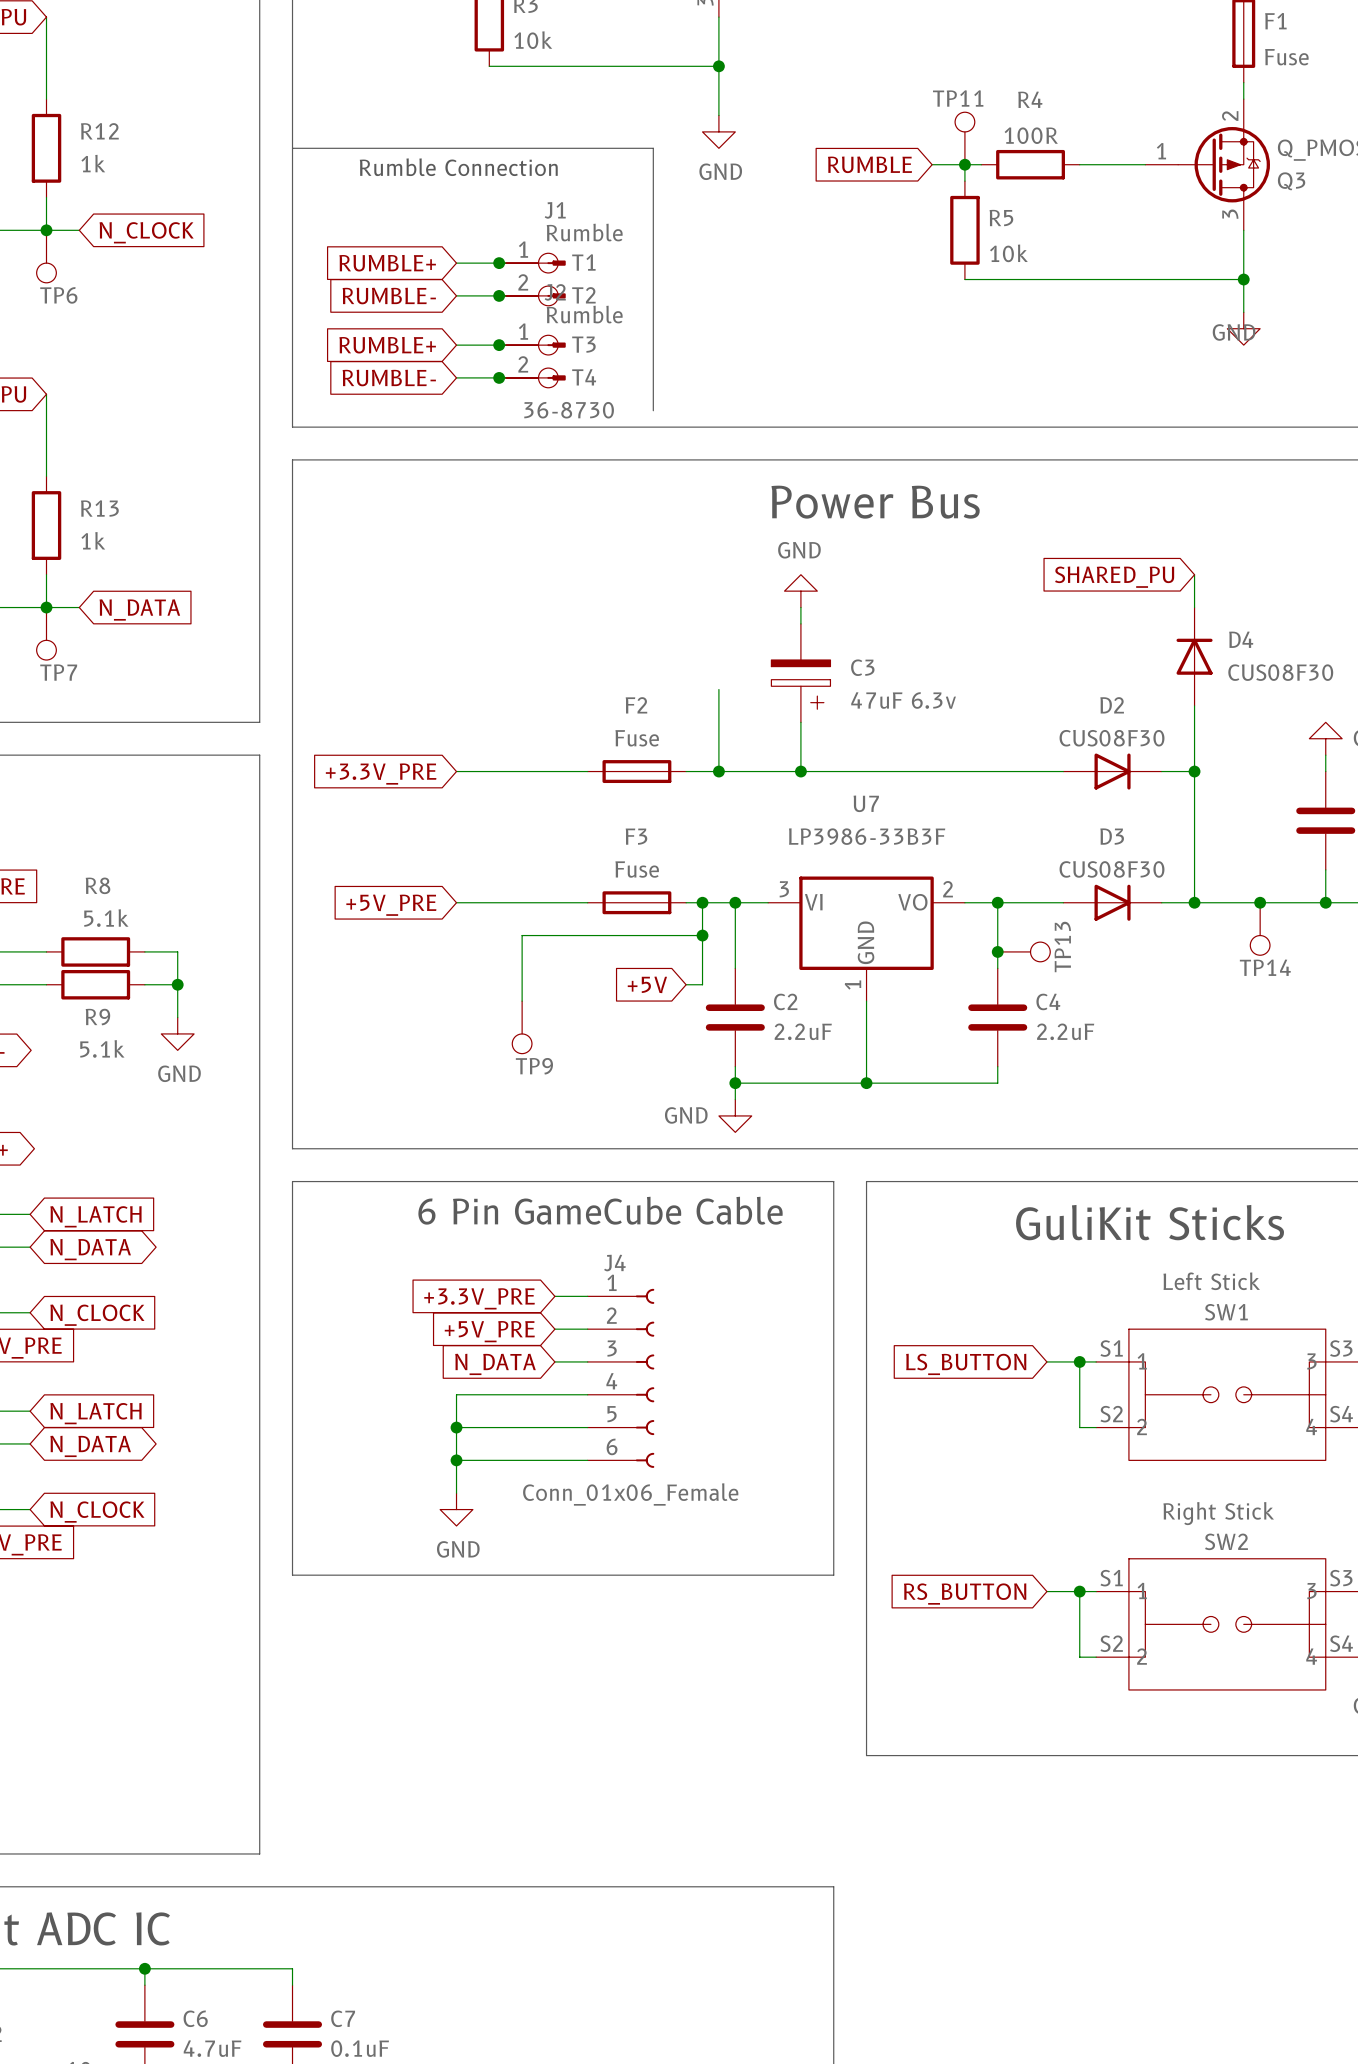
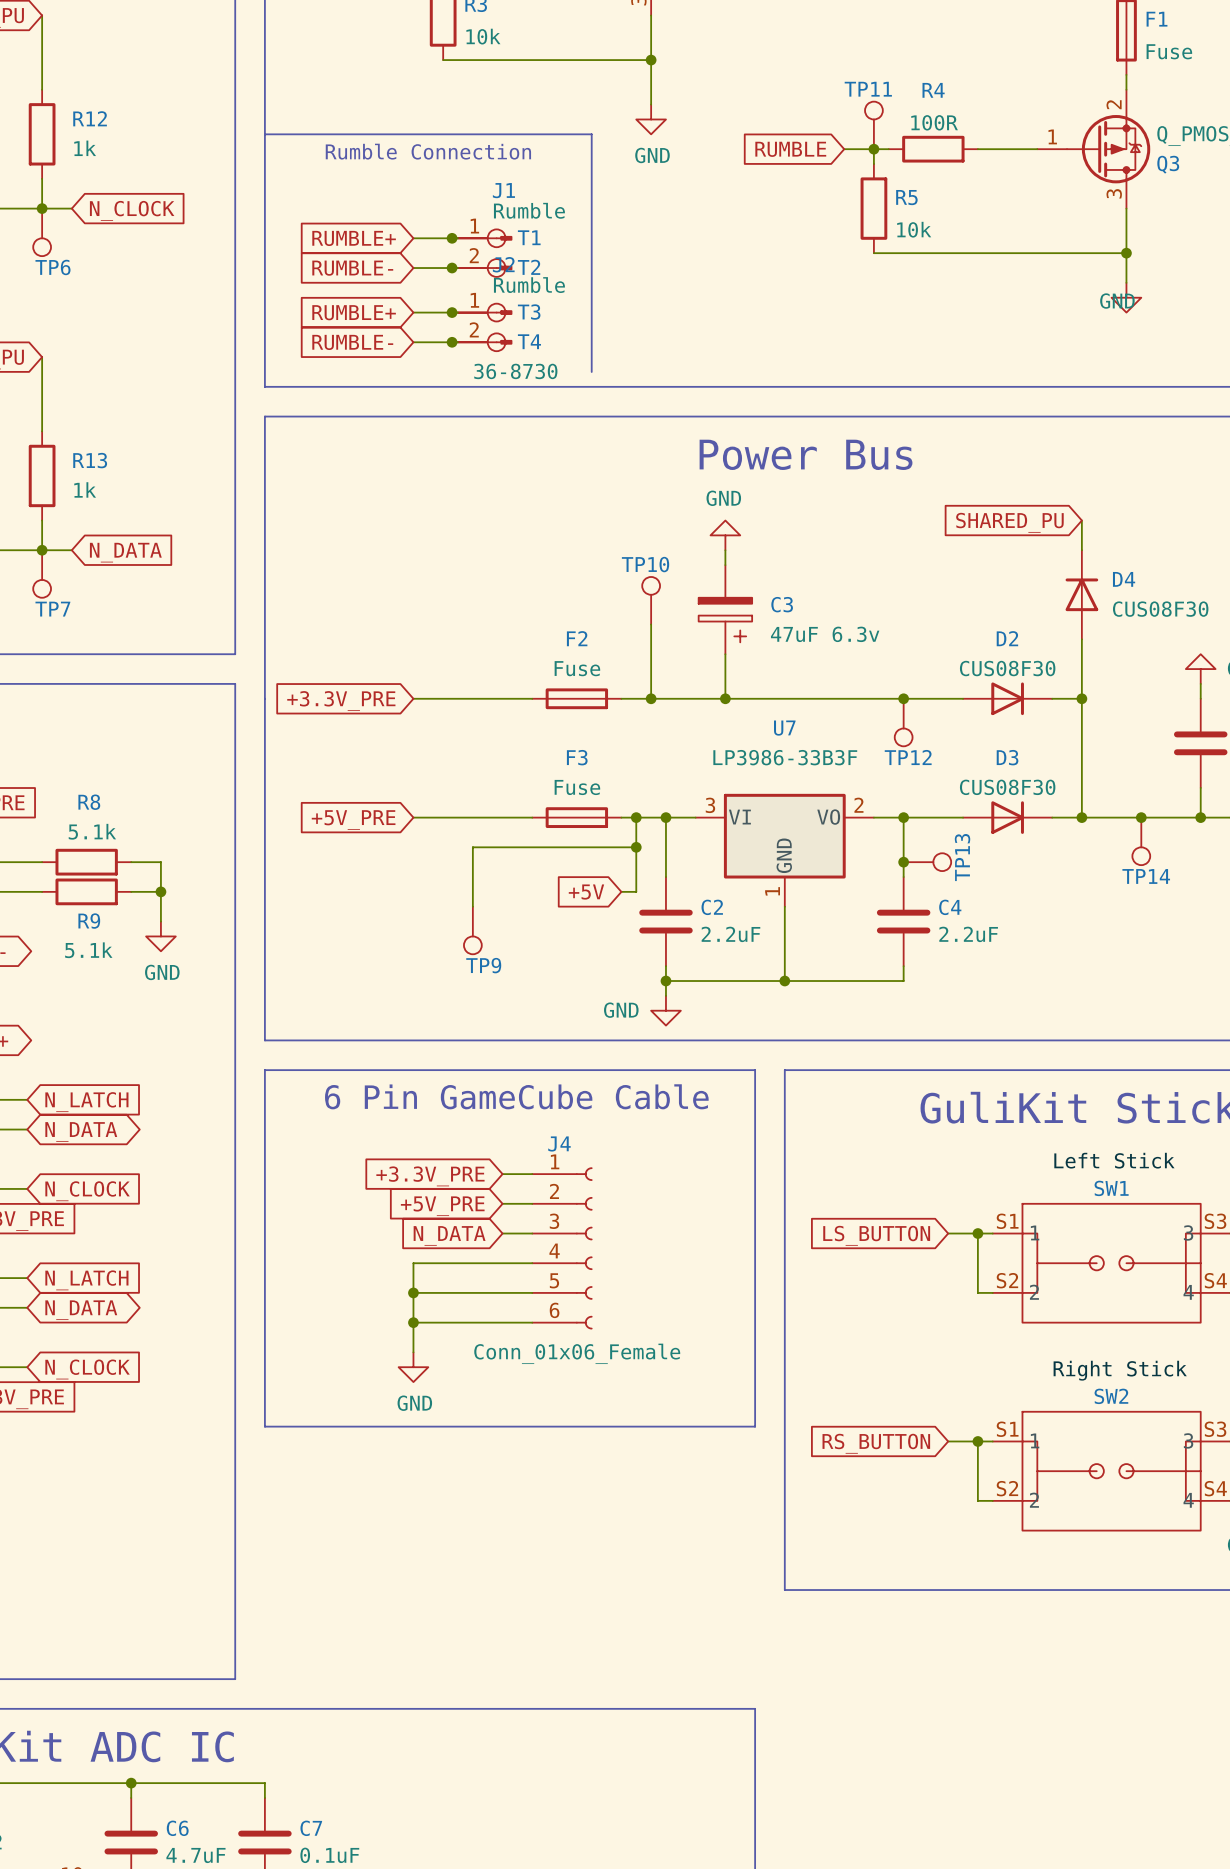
TP10: none -> (651, 600)
junction: none -> (903, 698)
TP12: none -> (903, 722)

